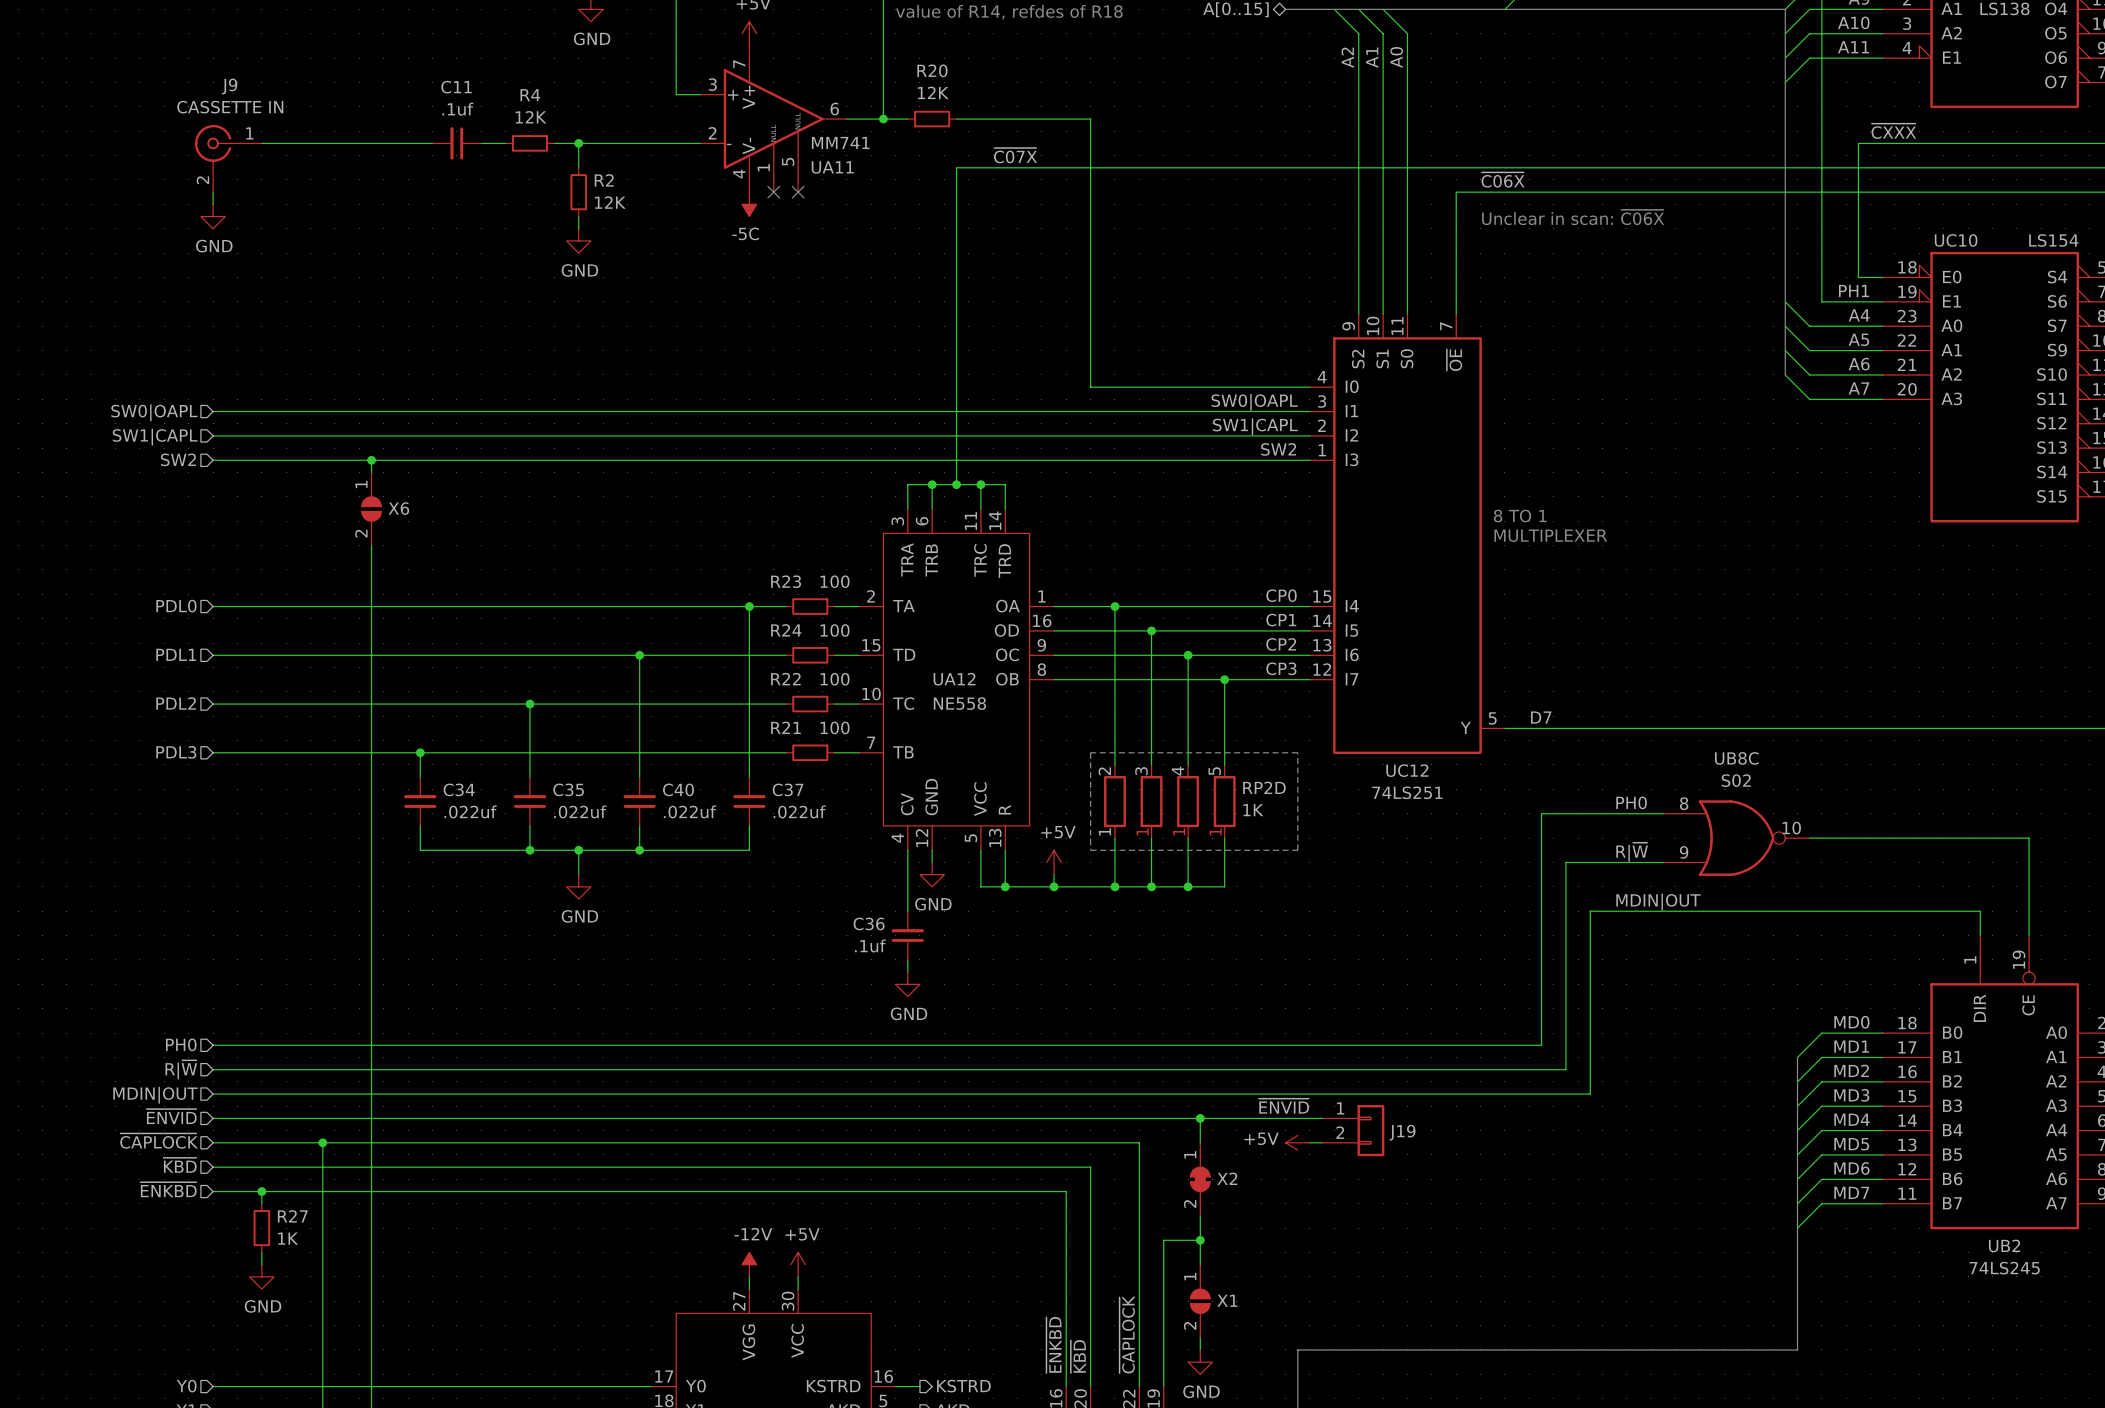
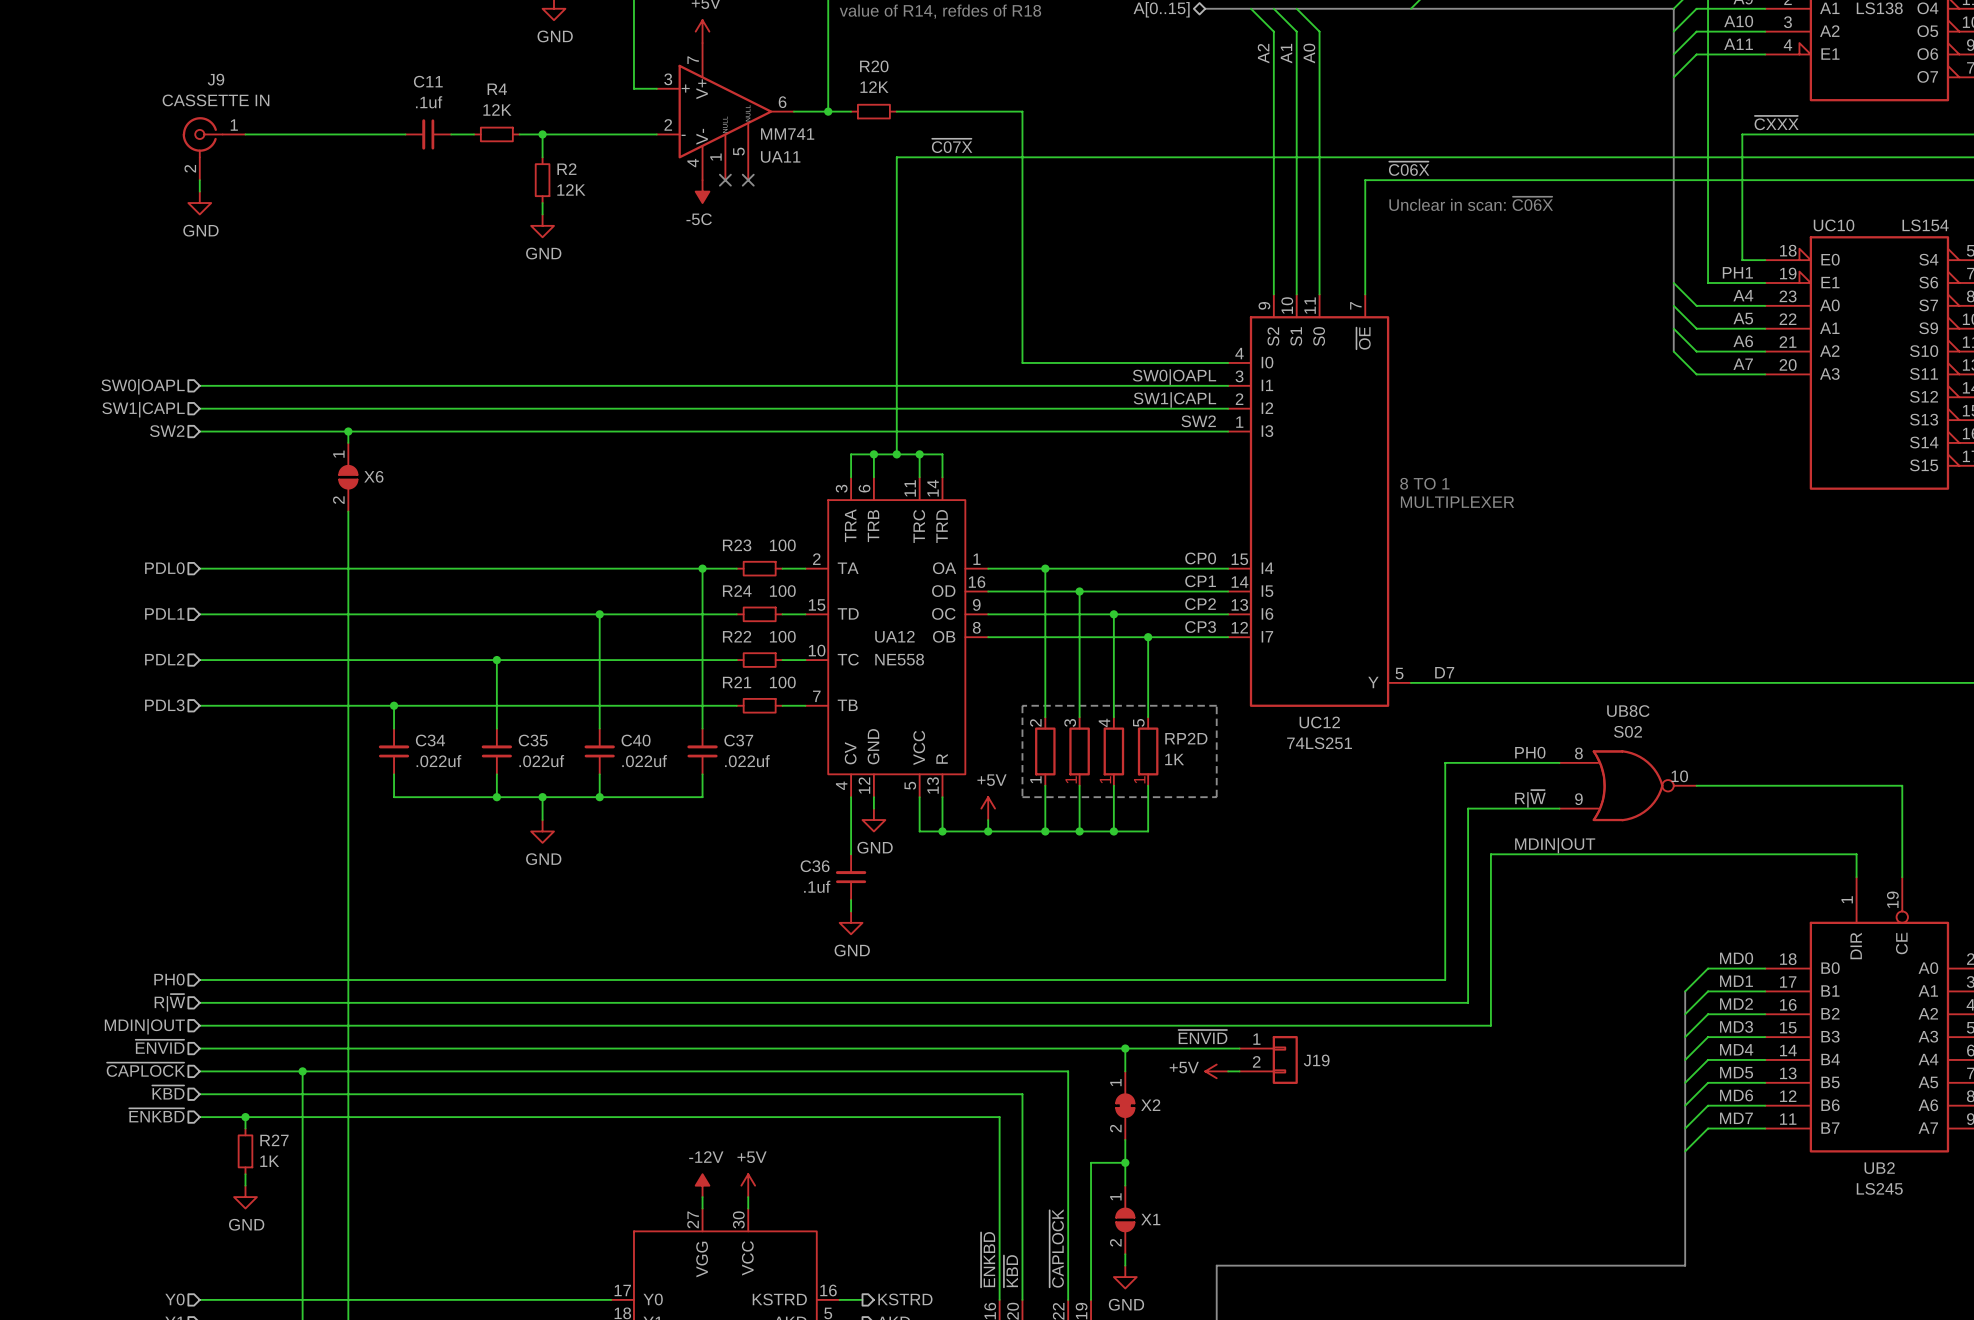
UB2 value: 74LS245 (2004, 1268) -> LS245 (1879, 1188)

